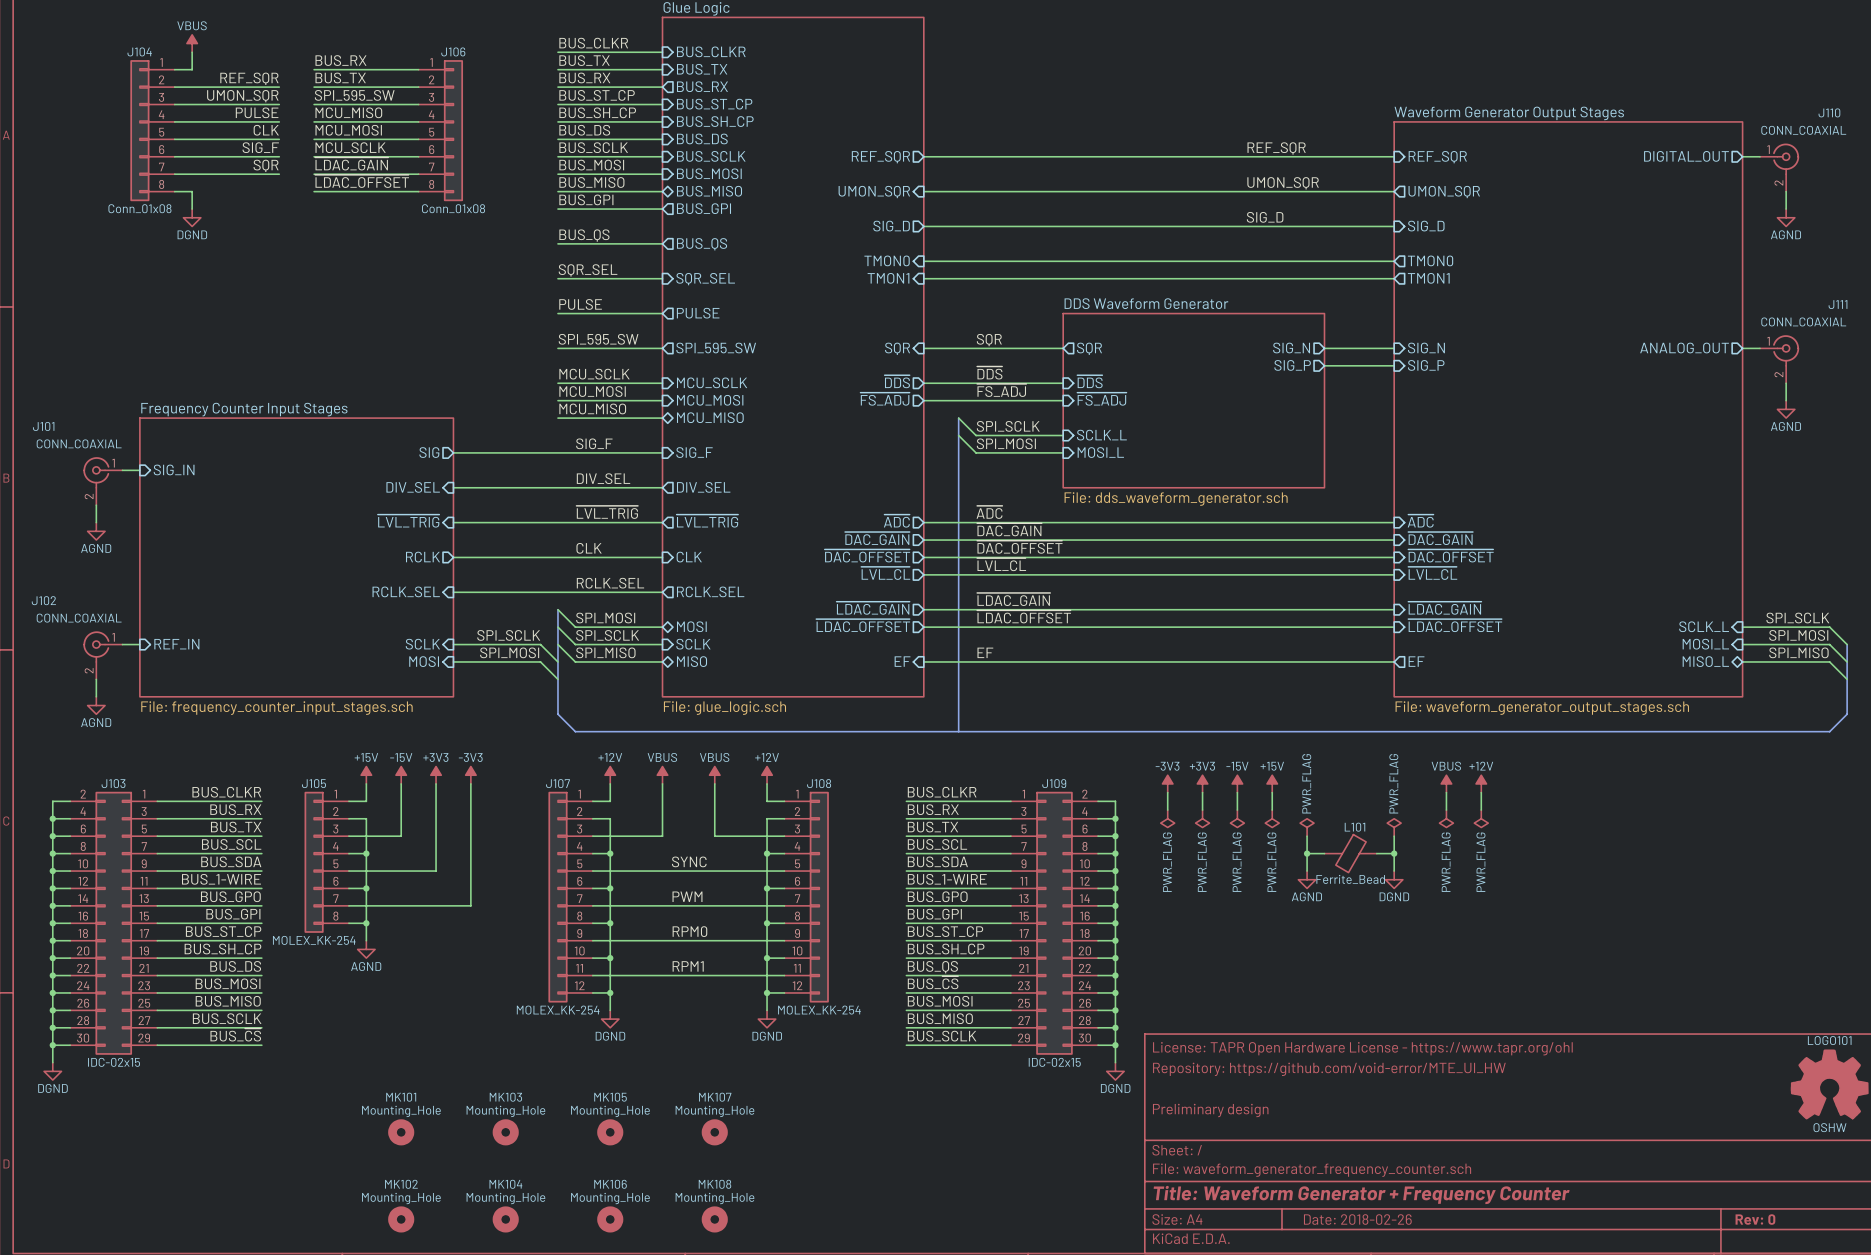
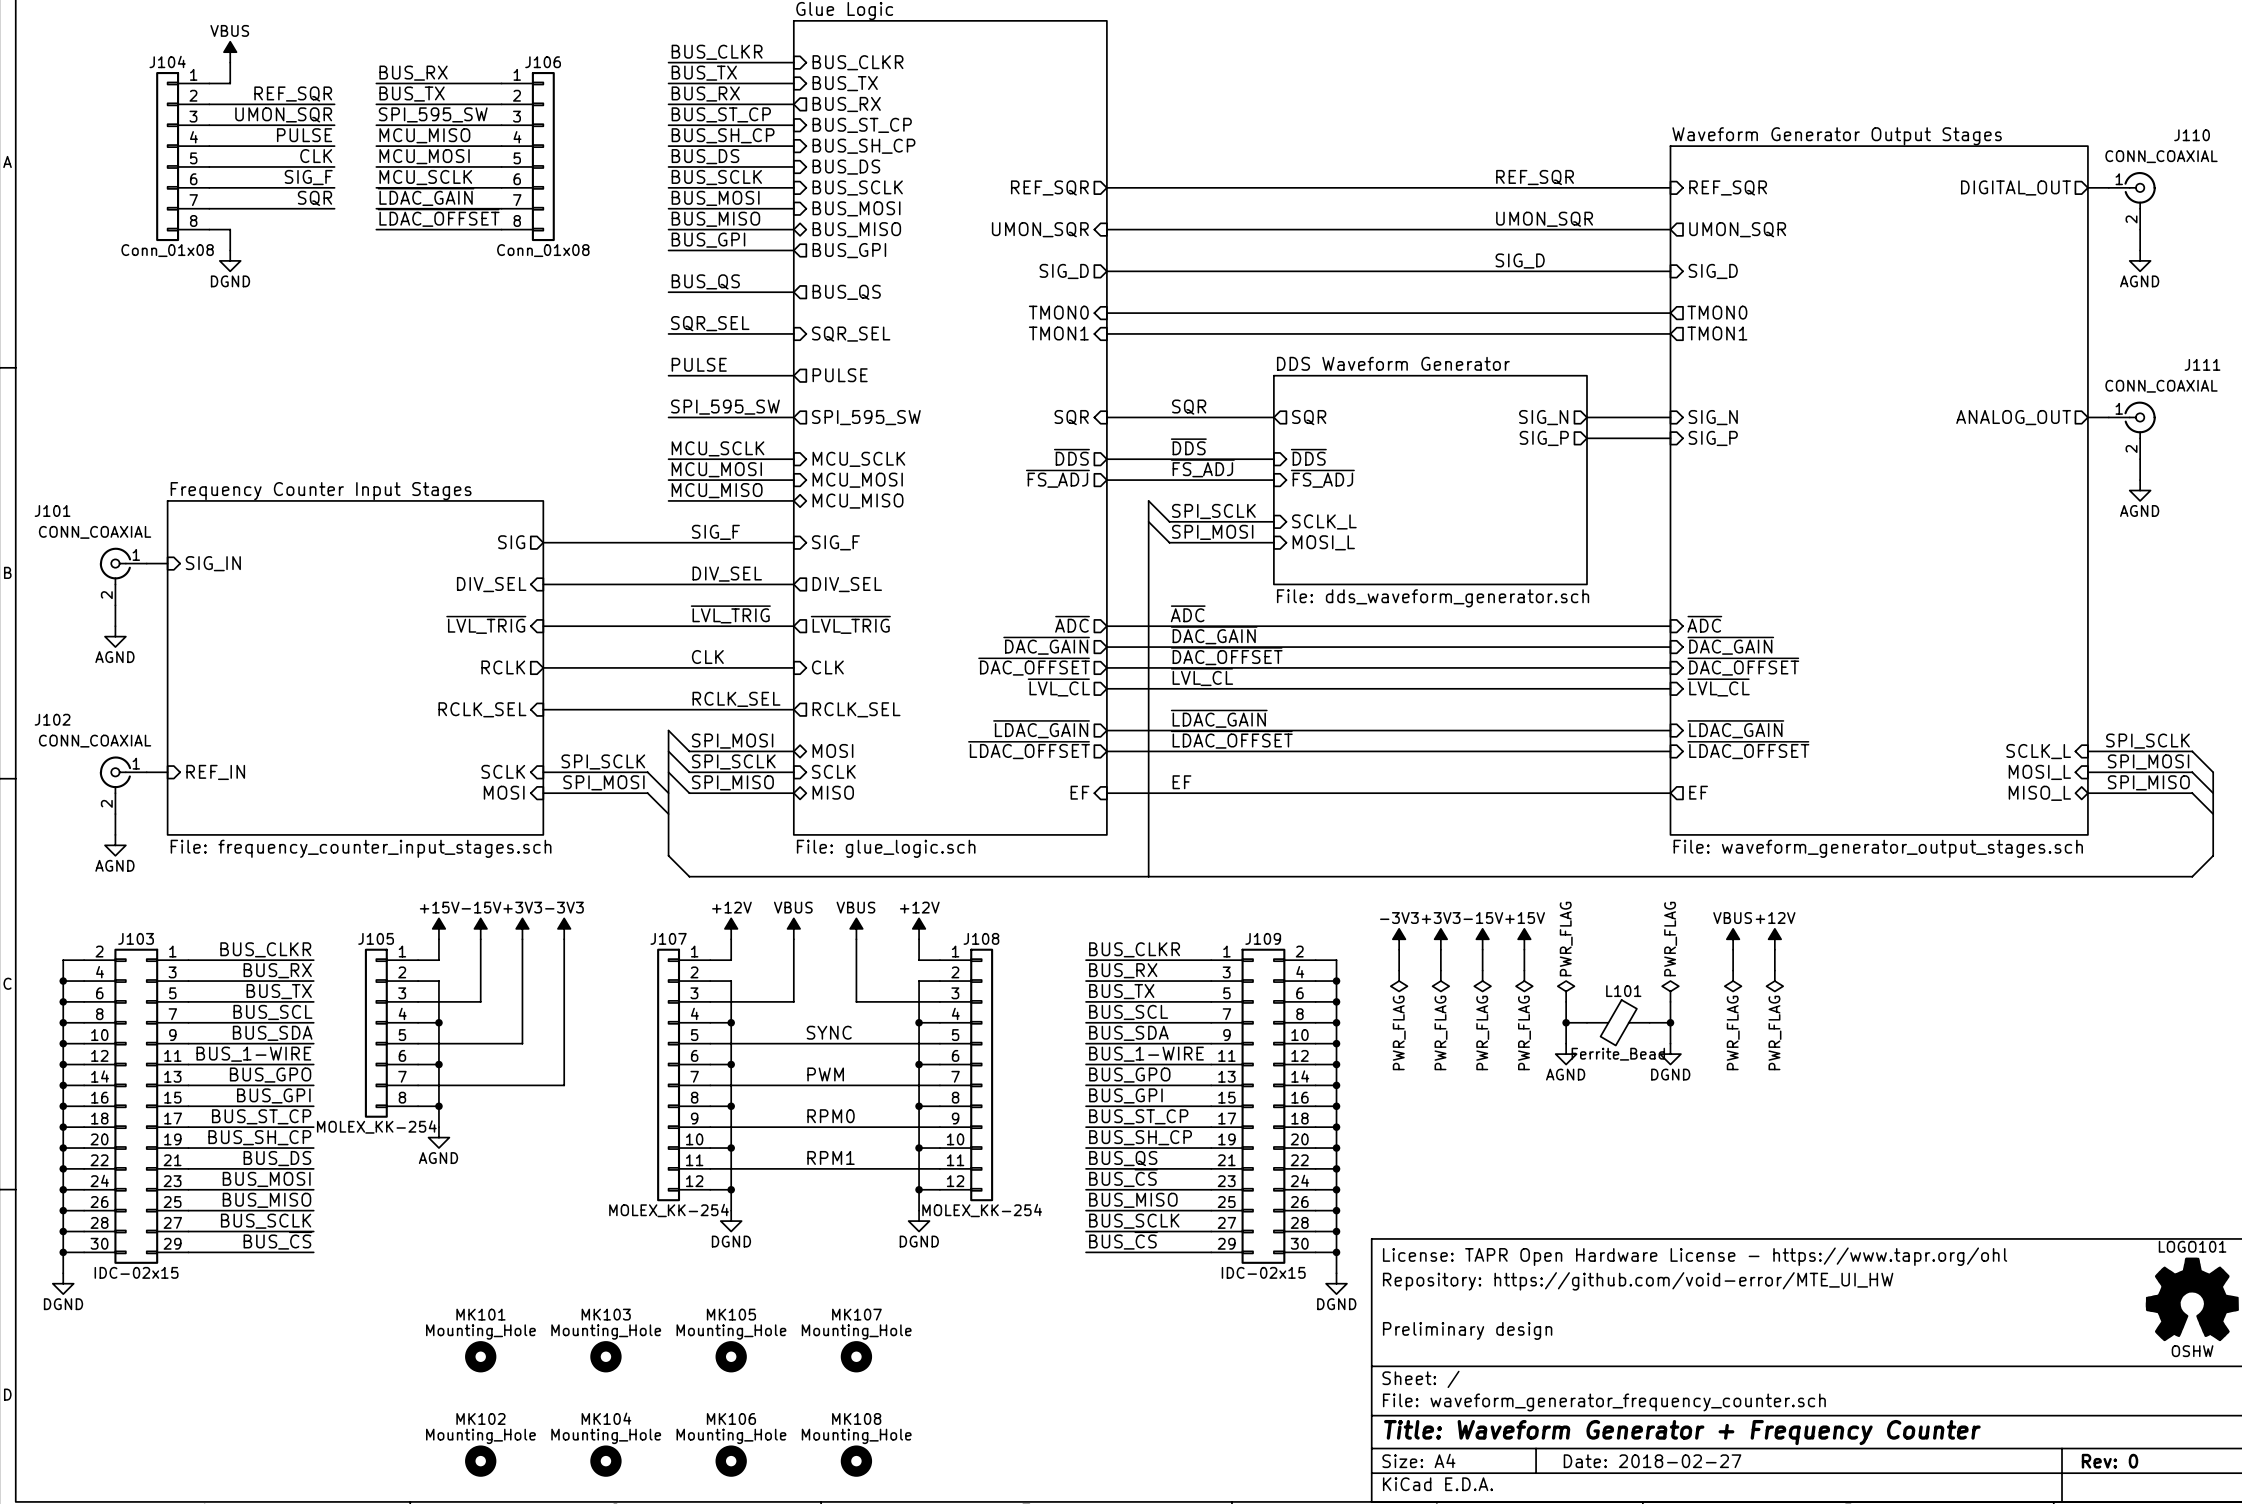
label: BUS_MOSI (940, 1001) -> BUS_MISO (1133, 1200)
label: BUS_MISO (940, 1018) -> BUS_SCLK (1134, 1221)
label: BUS_SCLK (942, 1036) -> BUS_~{CS} (1123, 1240)
title block: Date: 2018-02-26 (1357, 1219) -> Date: 2018-02-27 (1652, 1461)

